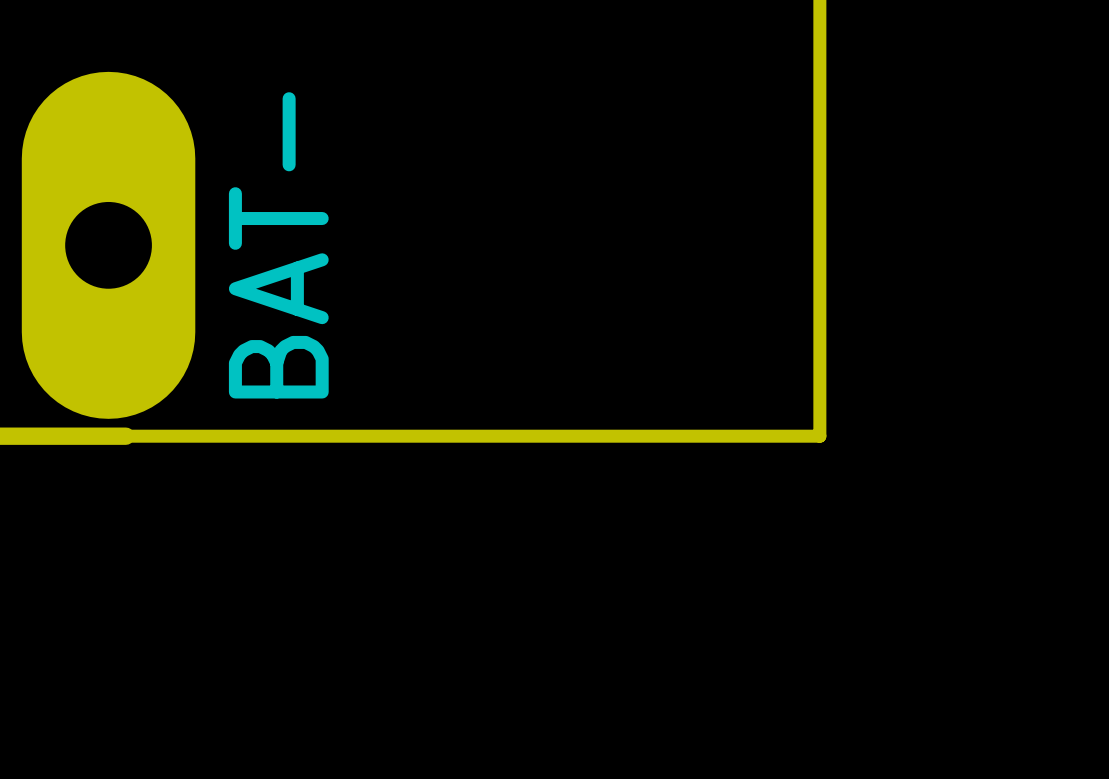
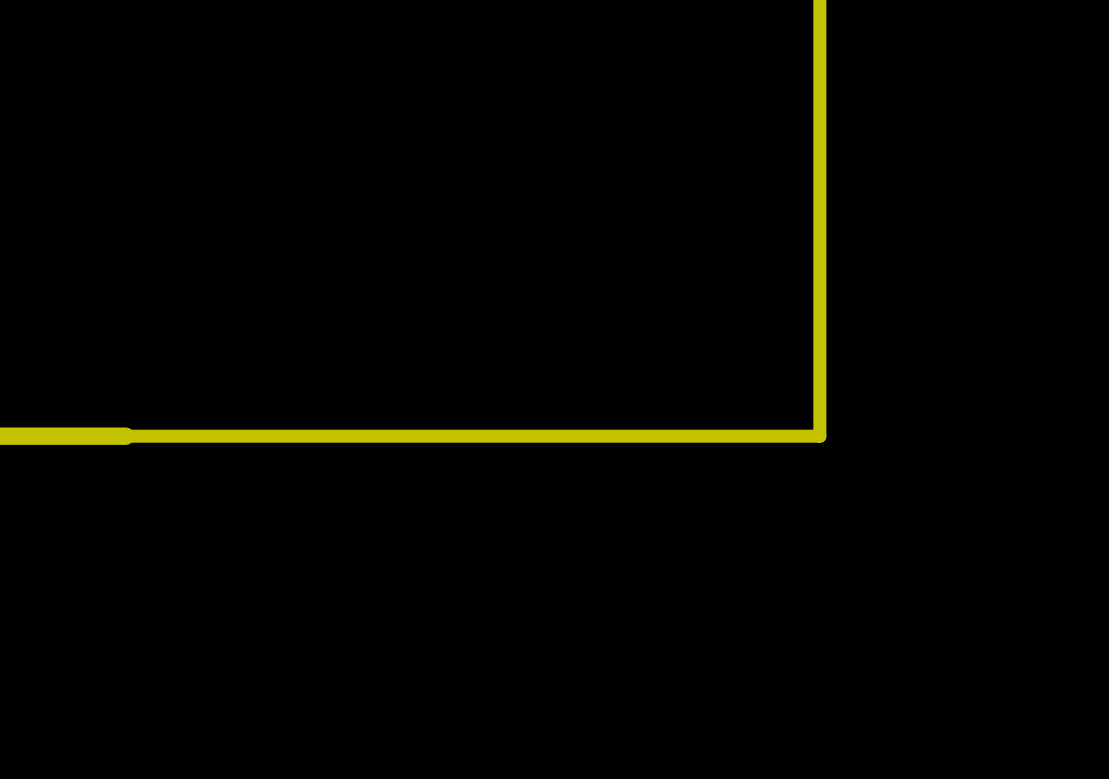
part: BAT- (108, 245) -> none

